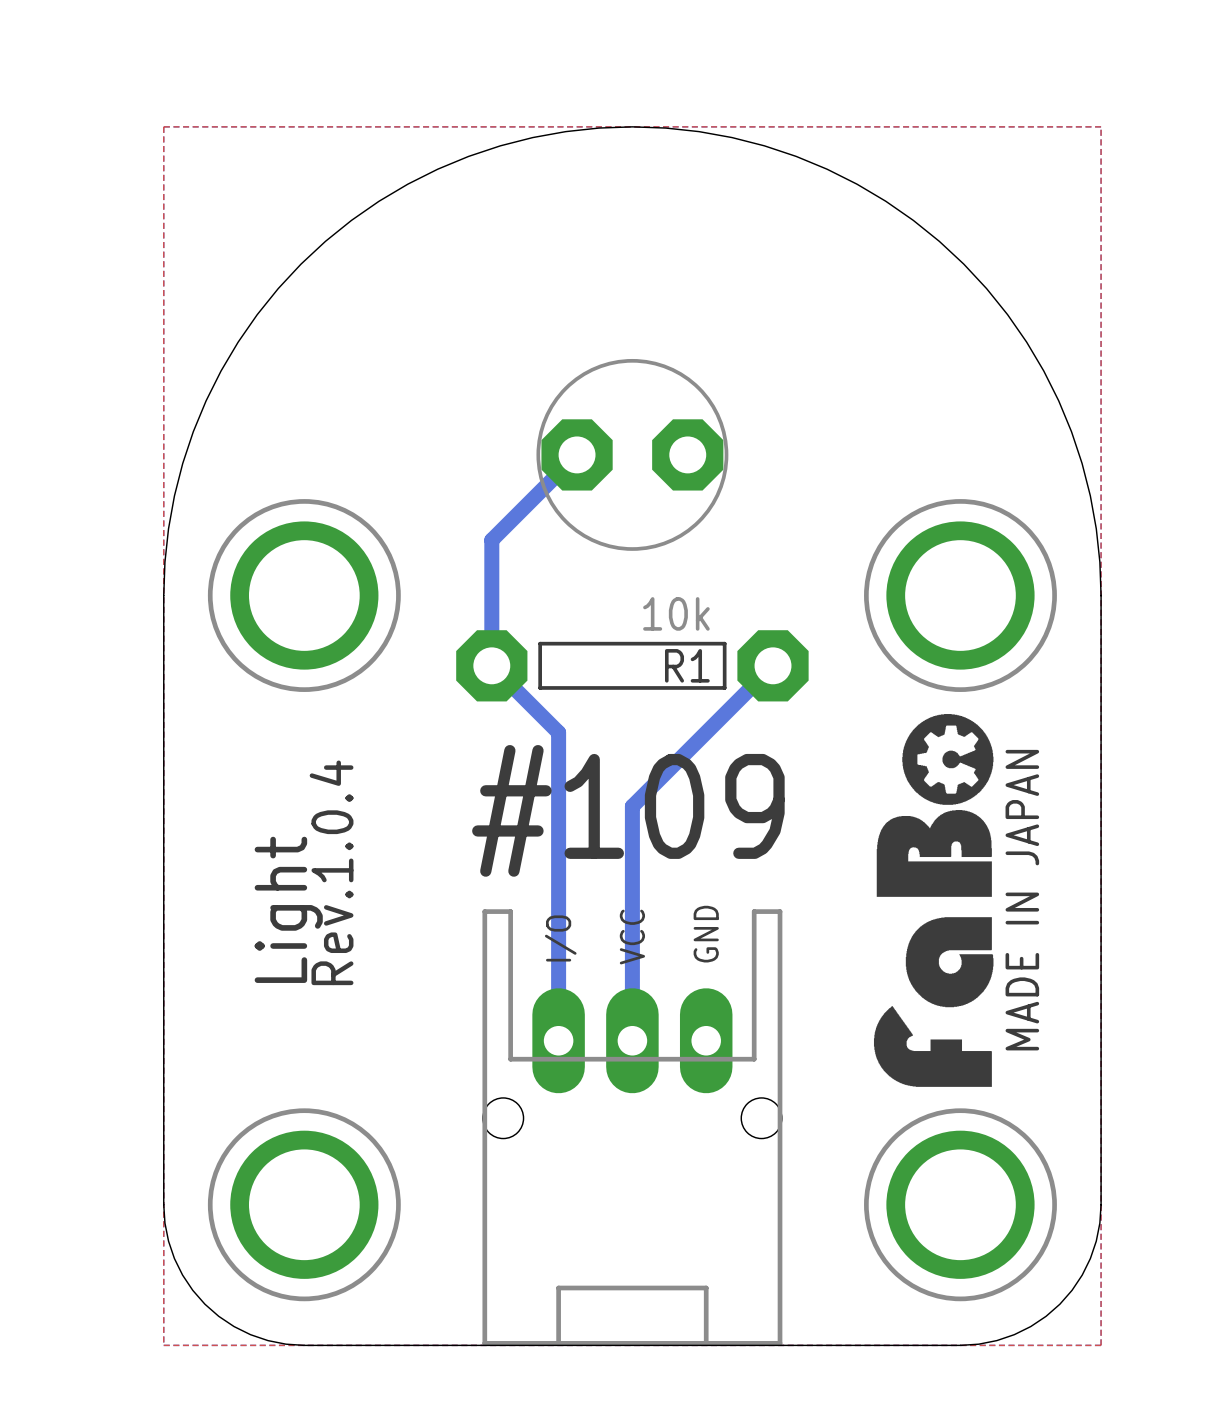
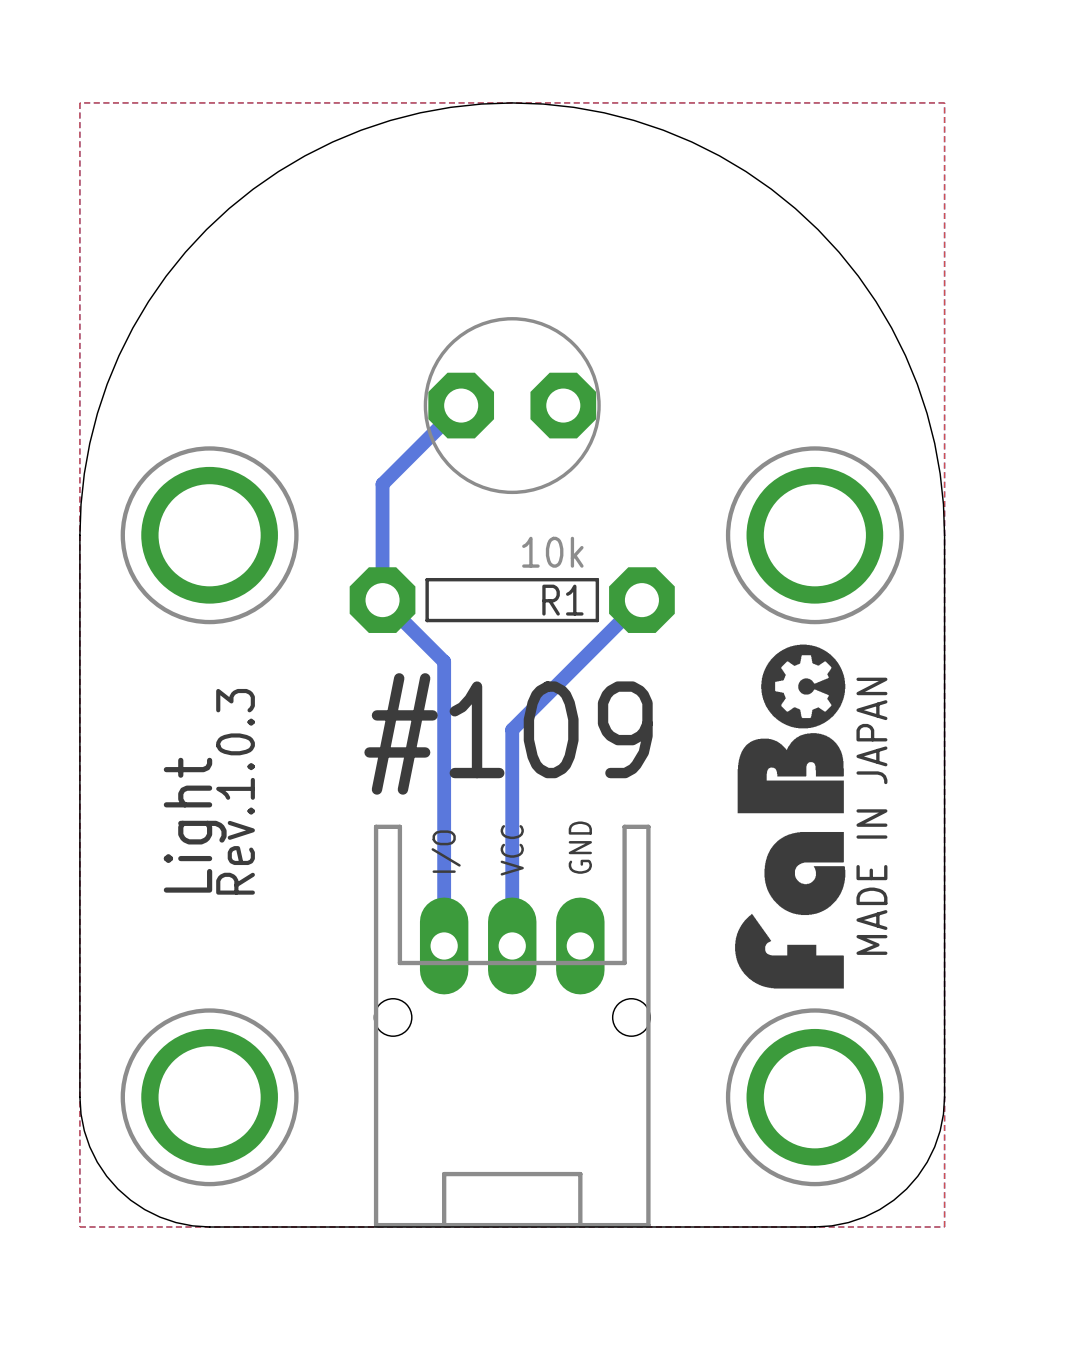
text: Rev.1.0.4 (331, 872) -> Rev.1.0.3 (235, 791)

